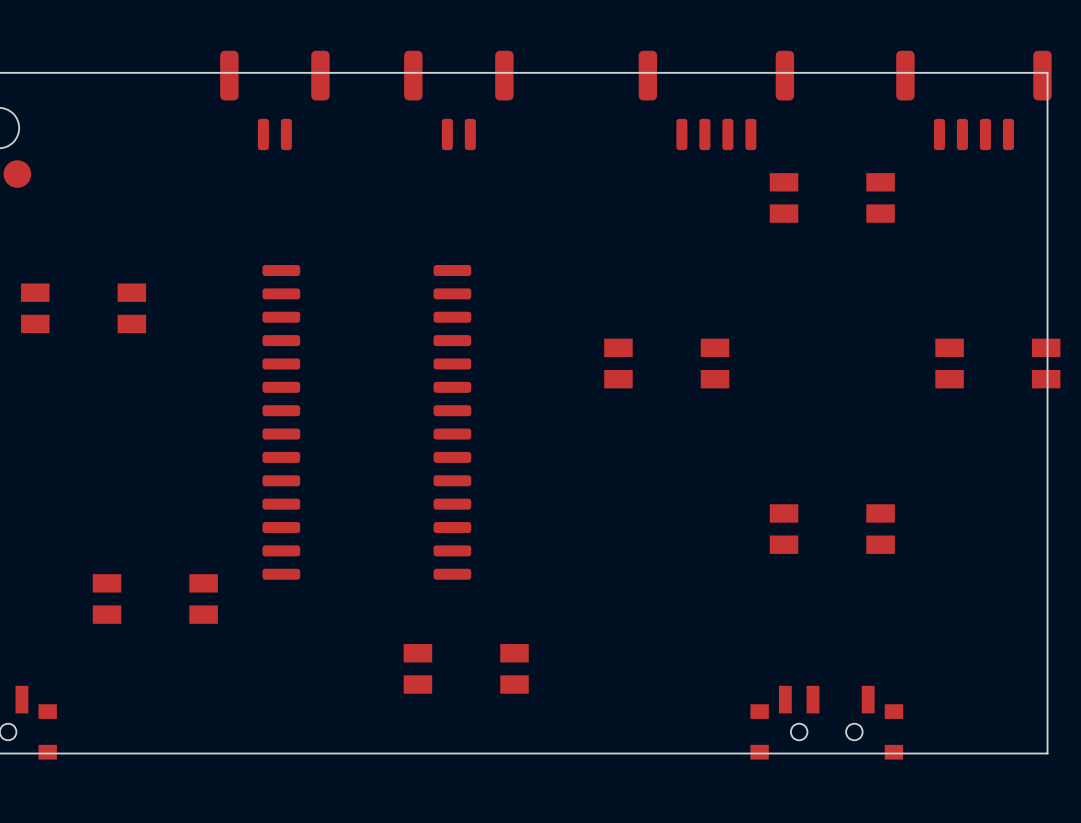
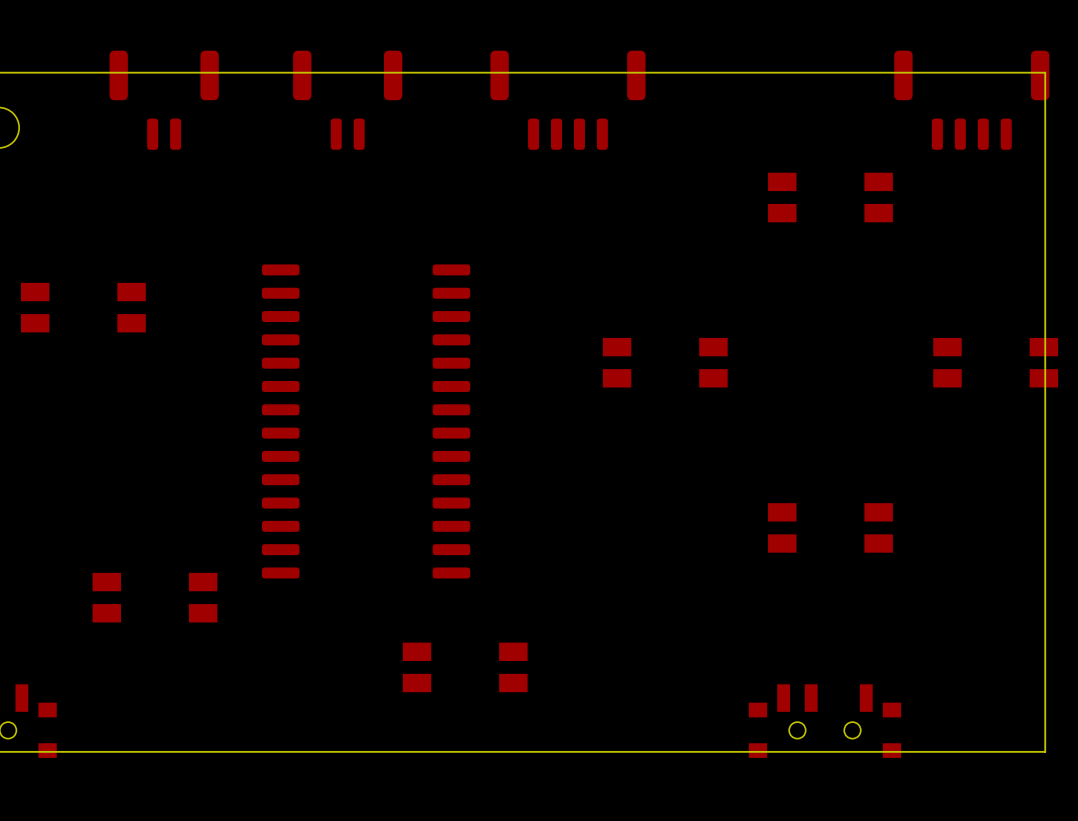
part: none -> (164, 100)
part: (274, 100) -> none
part: none -> (347, 100)
part: (458, 100) -> none
part position: (716, 100) -> (567, 100)
part: (17, 174) -> none

